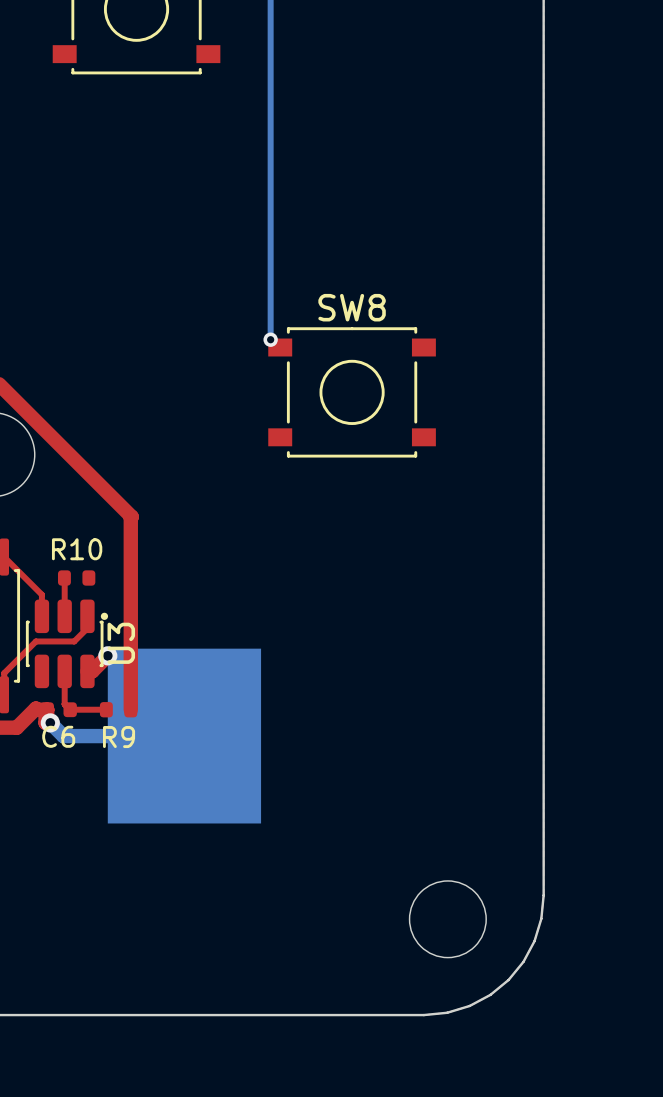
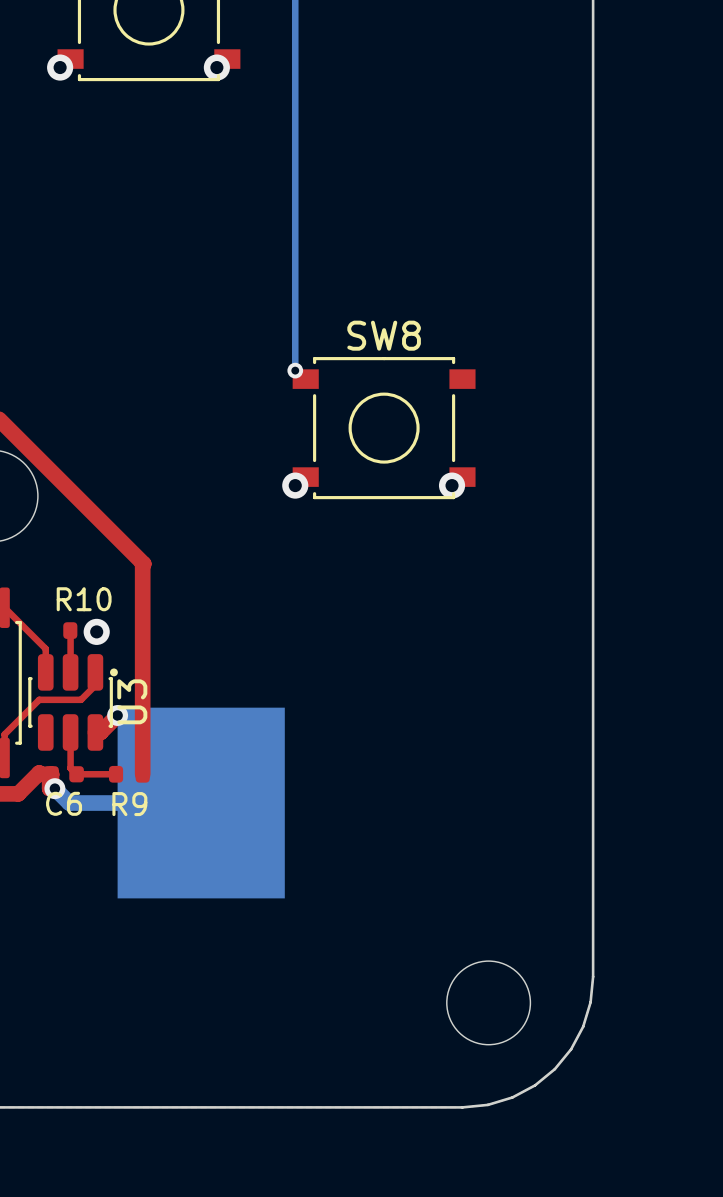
via: none -> (60, 67)
via: none -> (216, 67)
via: none -> (295, 485)
via: none -> (452, 485)
via: none -> (96, 631)

